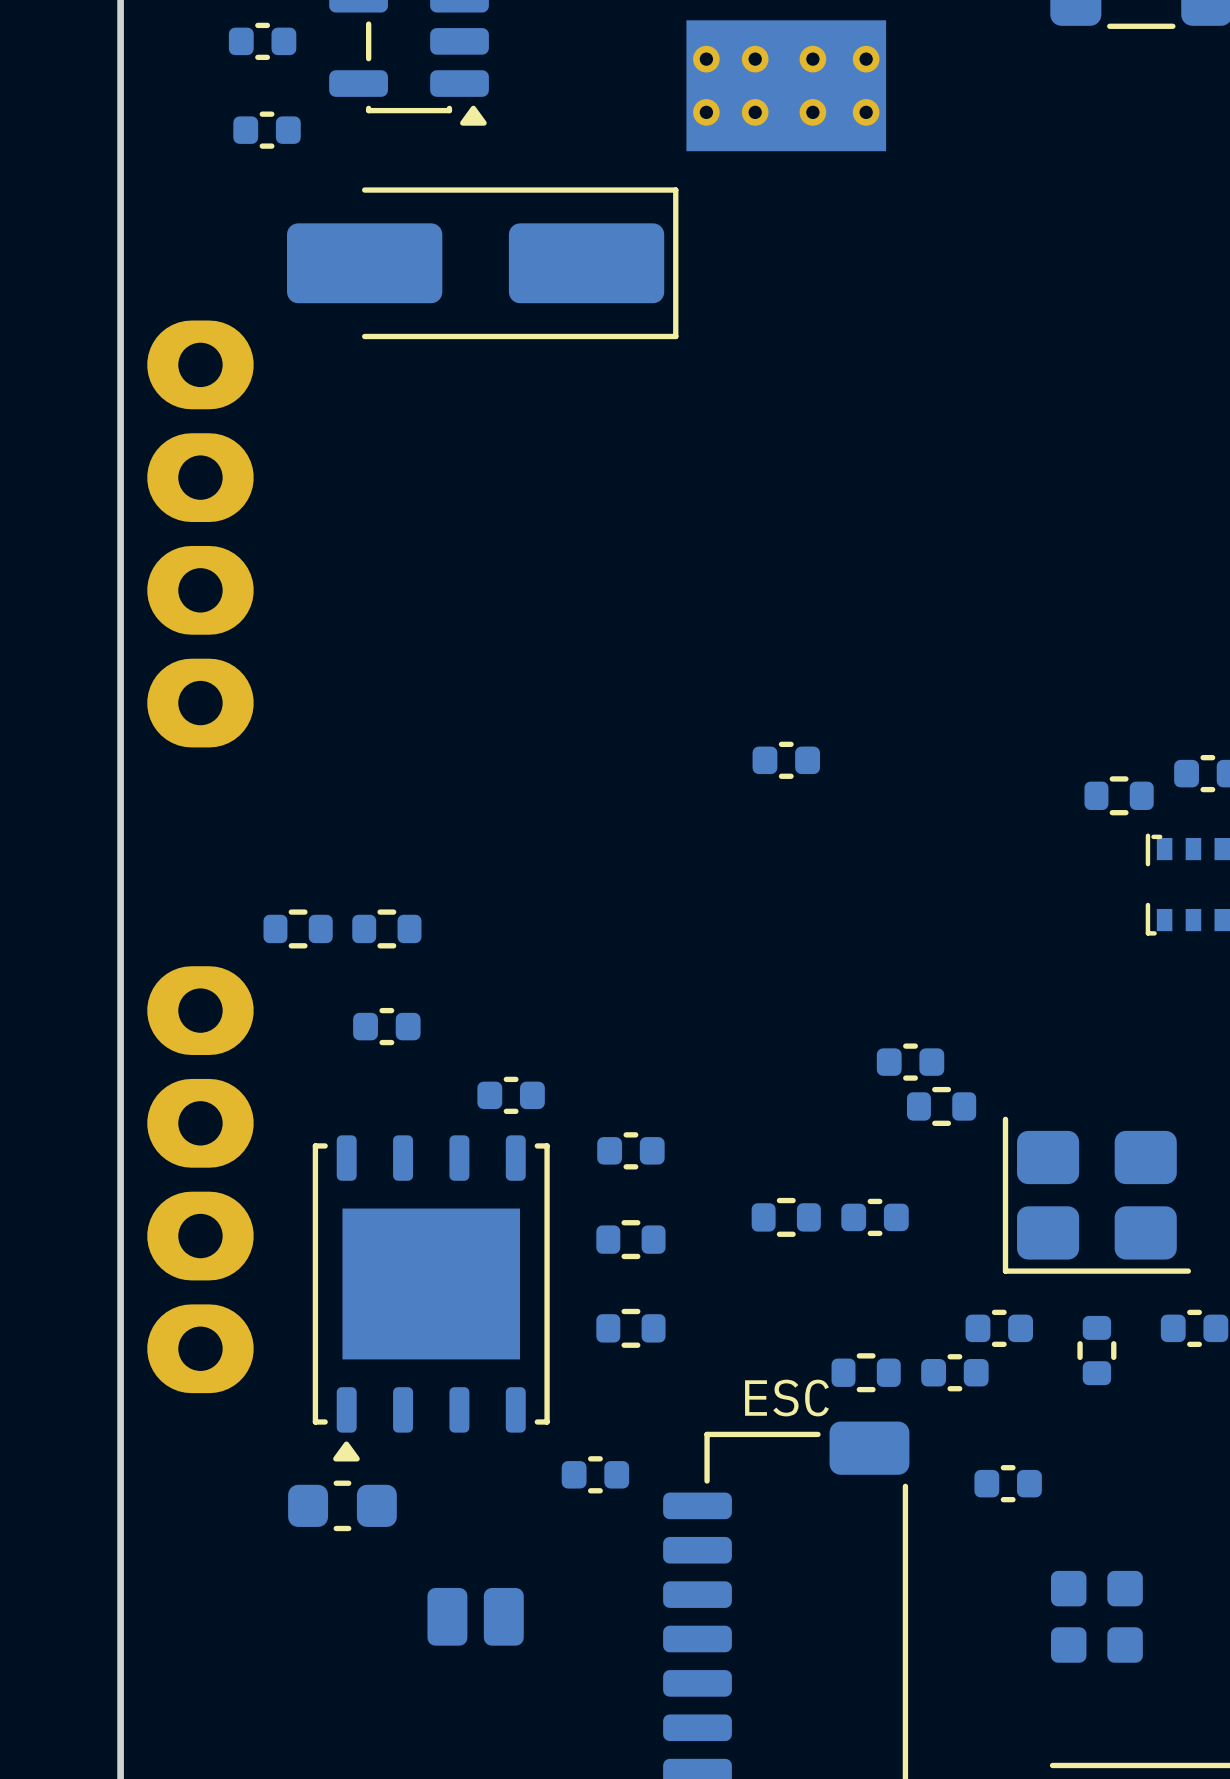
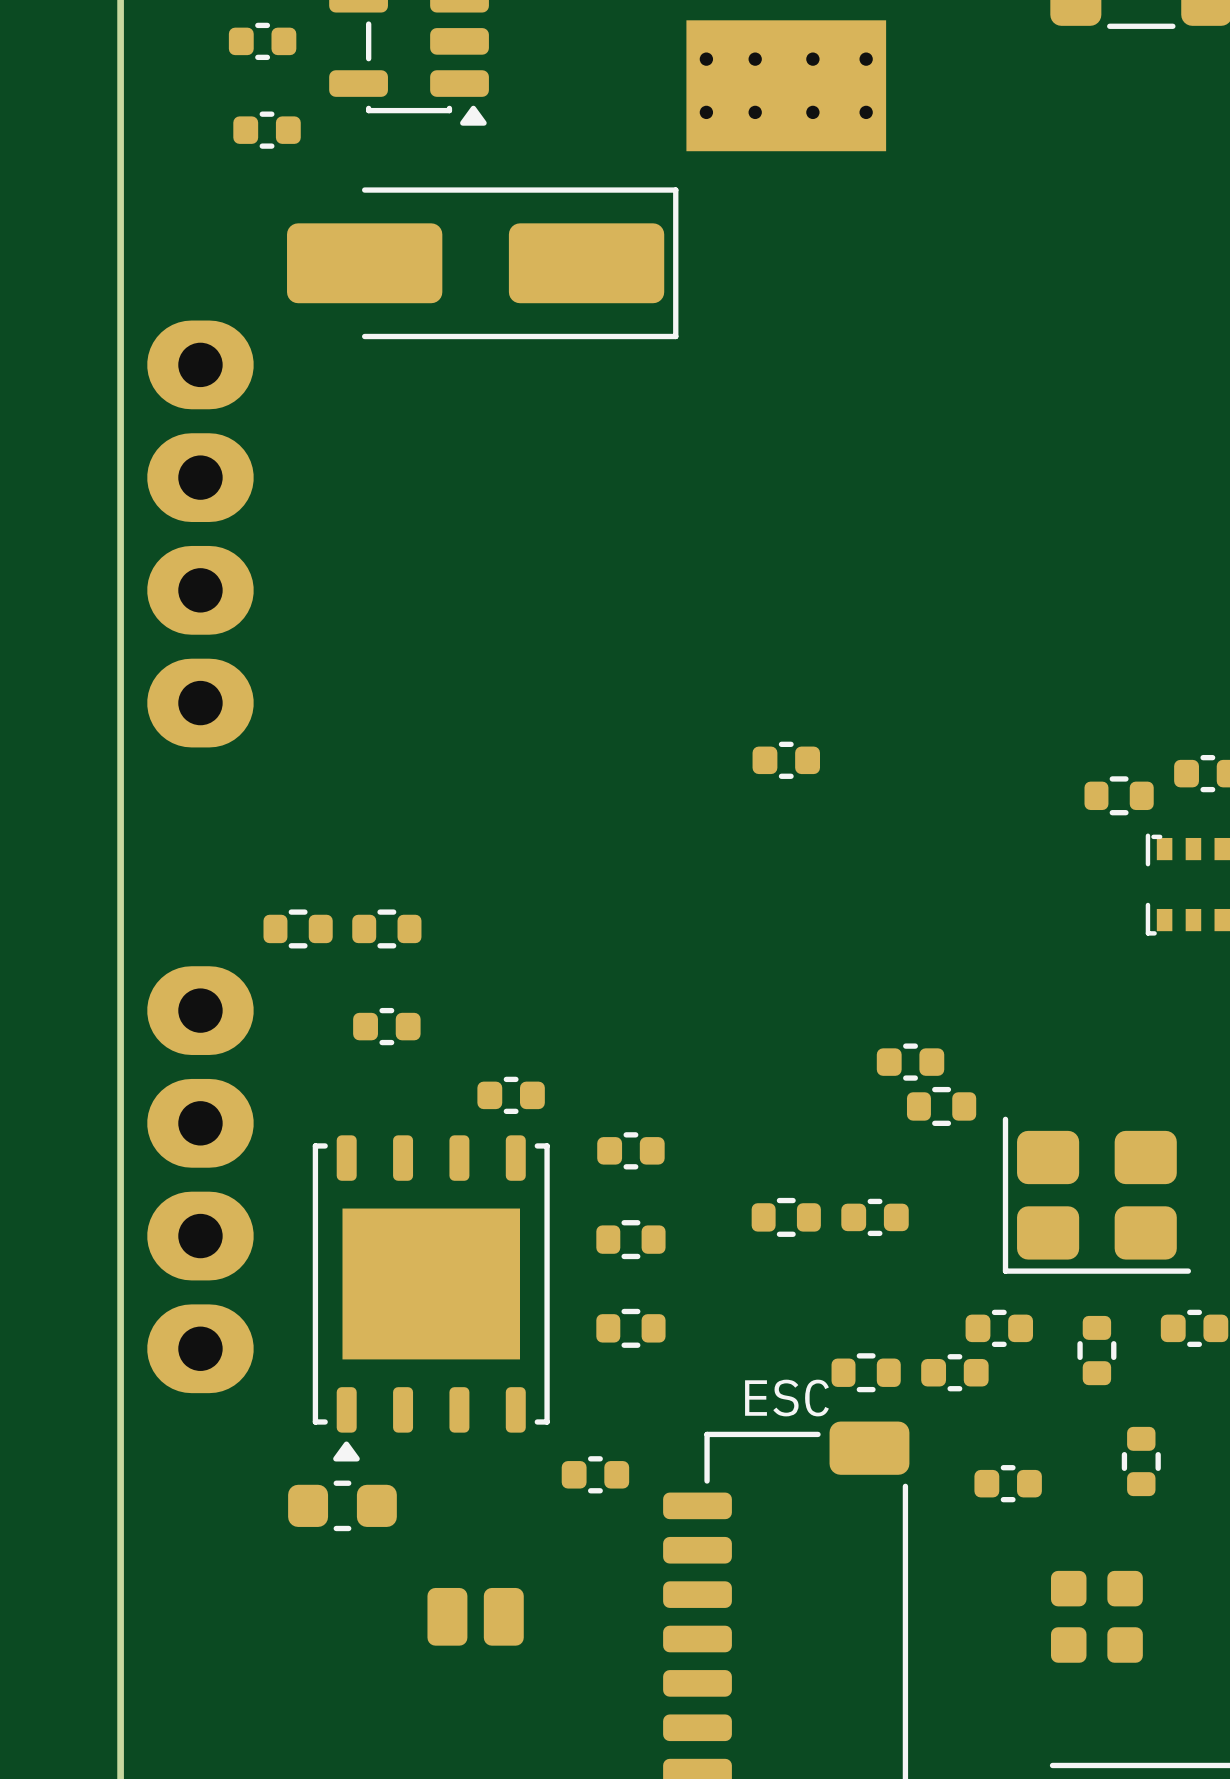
part: none -> (1141, 1461)

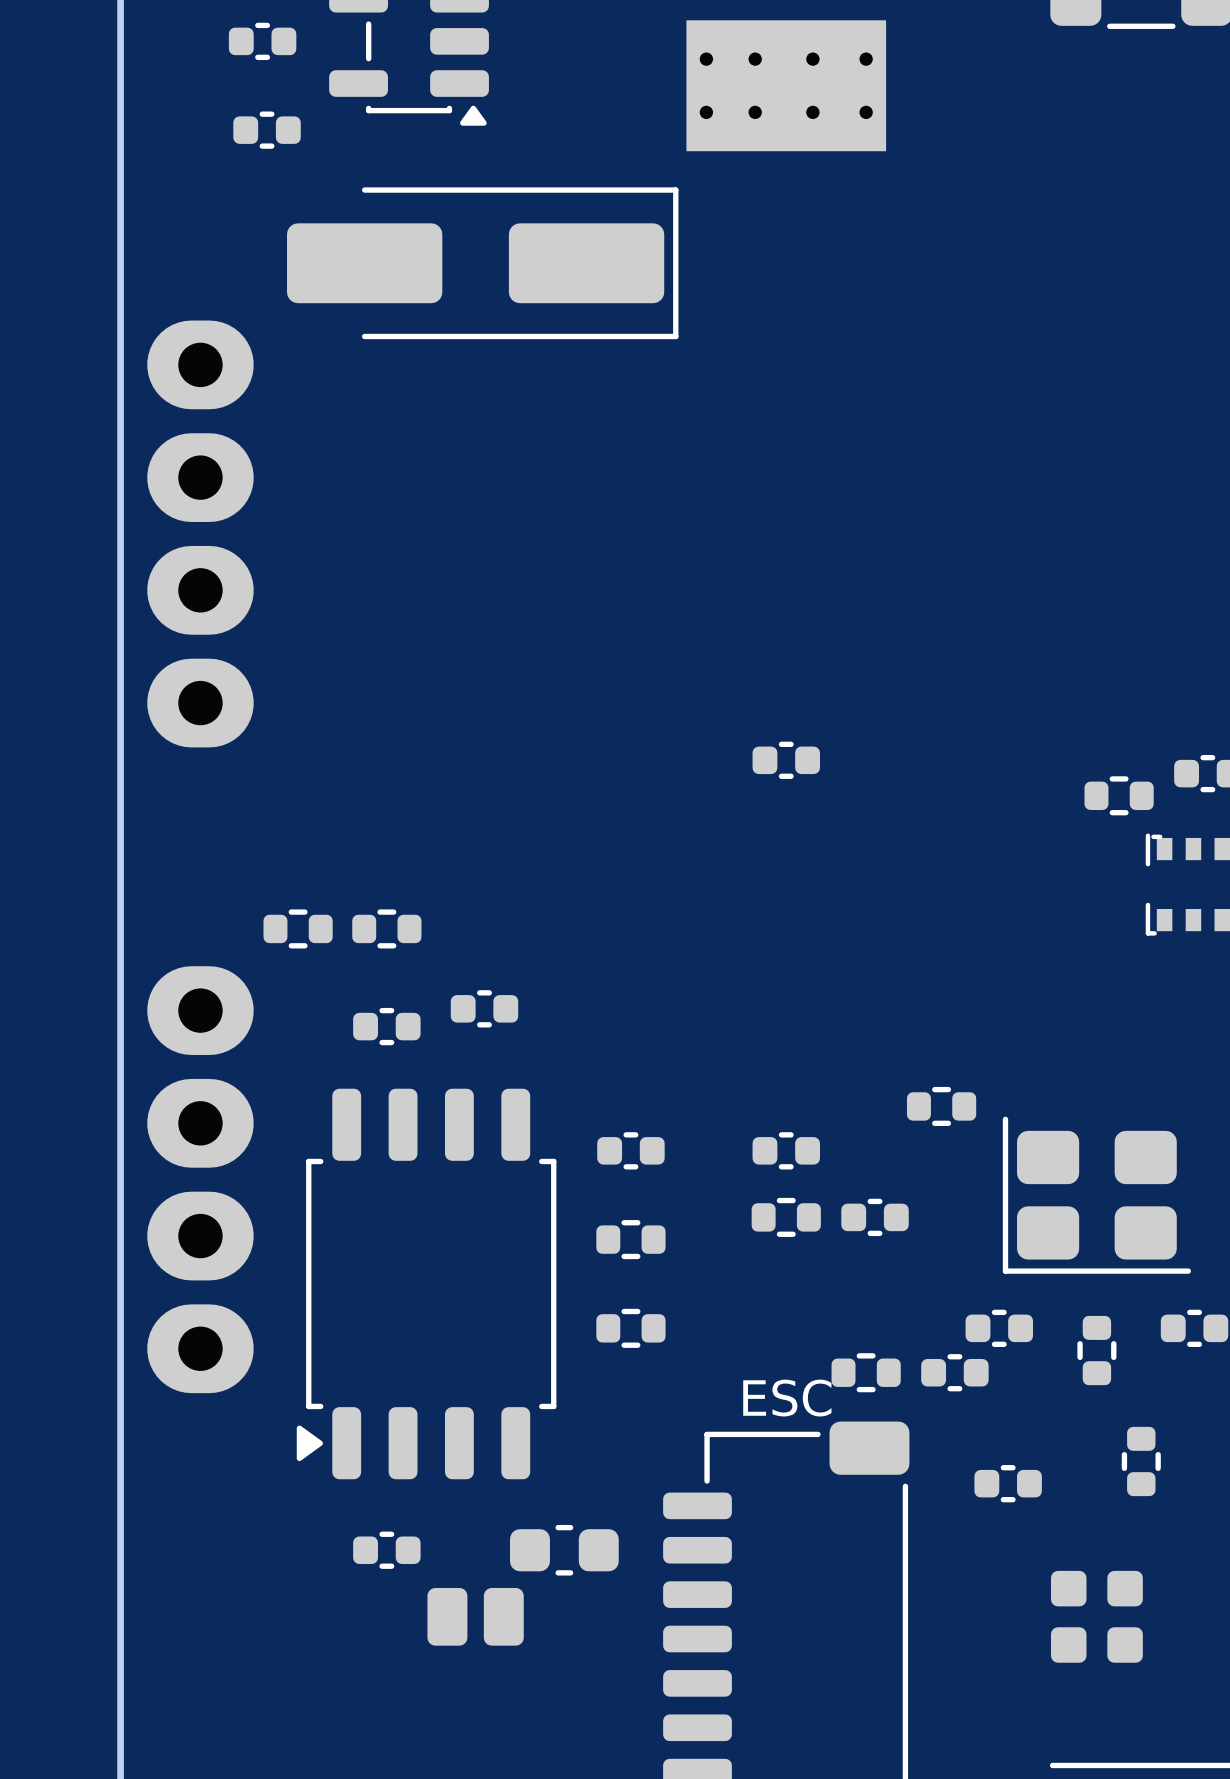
part: (910, 1062) -> none
part position: (511, 1095) -> (484, 1008)
part footprint: [312, 1135, 550, 1462] -> [296, 1088, 557, 1480]
part: none -> (786, 1150)
part: (595, 1474) -> none
part position: (342, 1505) -> (564, 1550)
part: none -> (386, 1550)

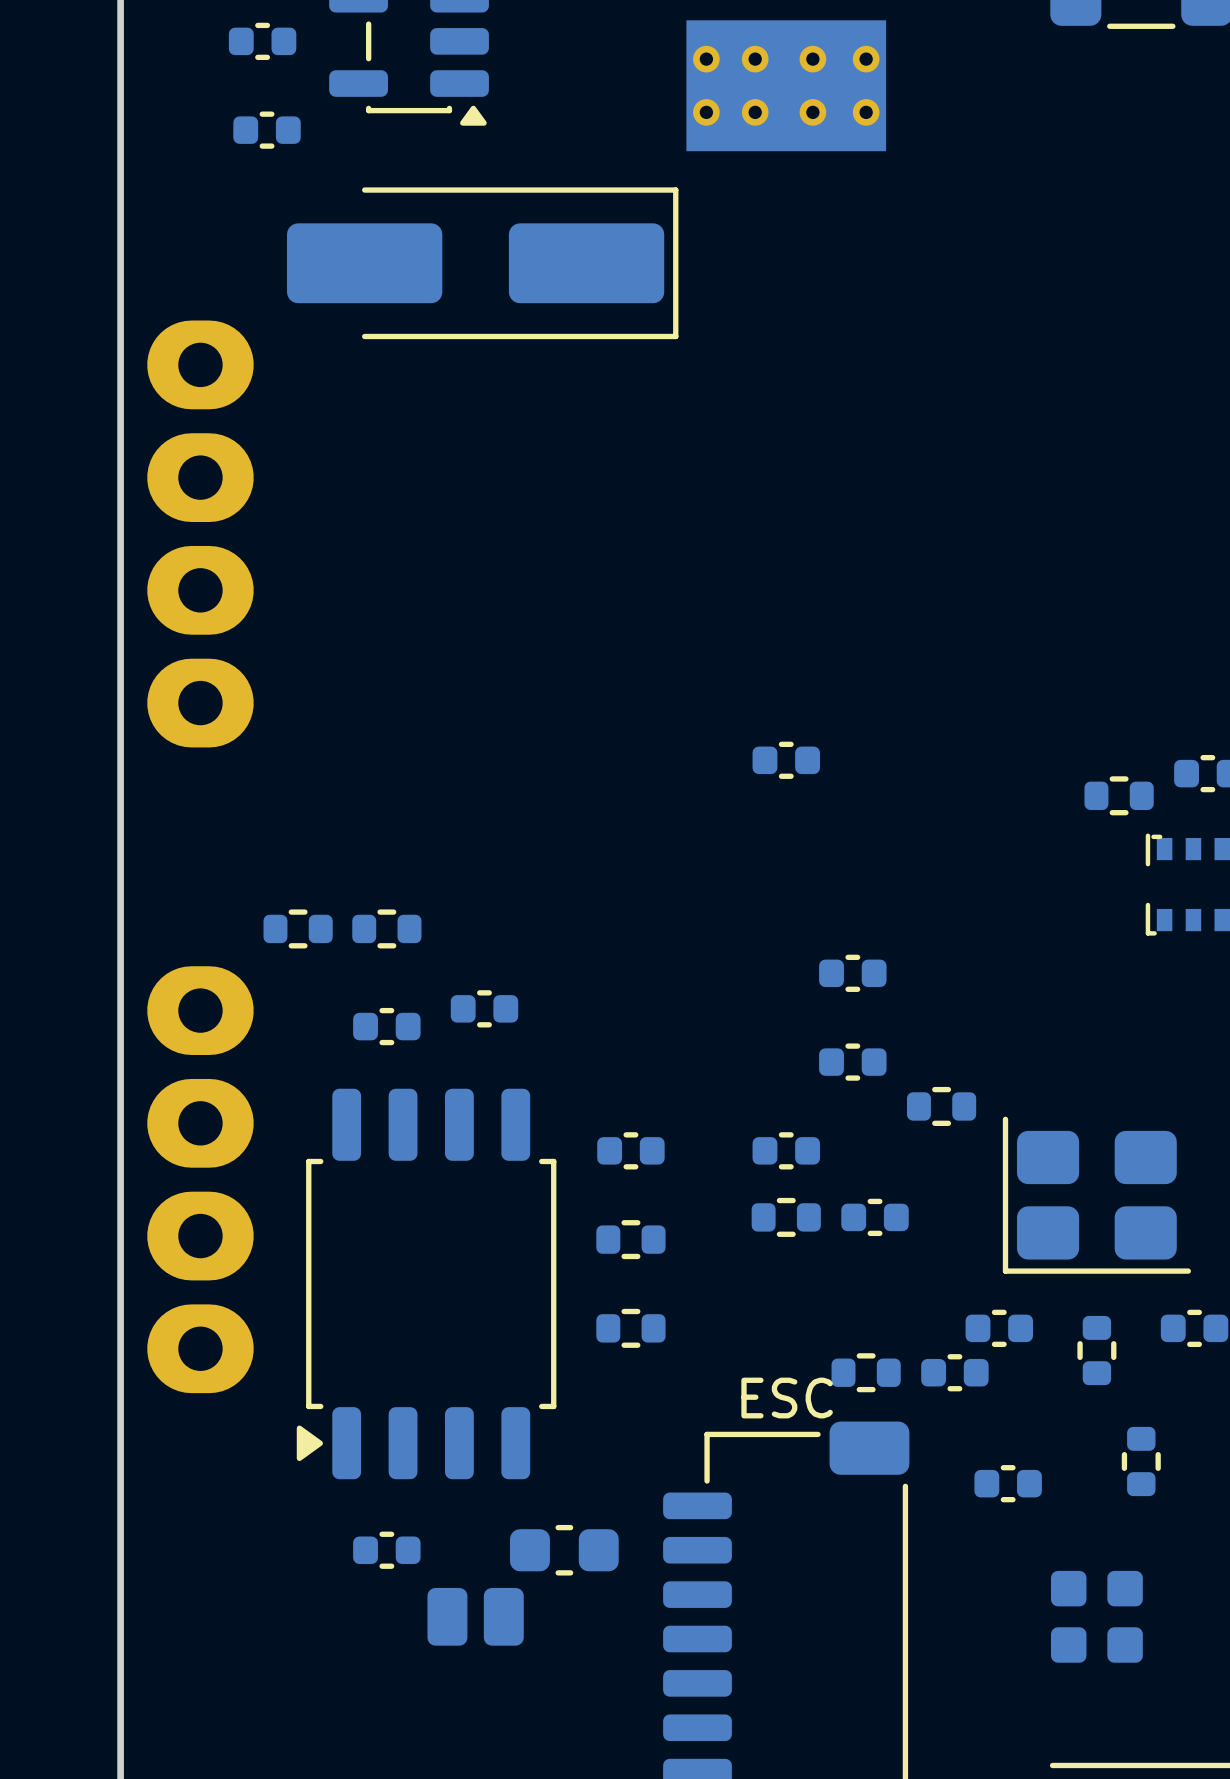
part: none -> (852, 973)
part: none -> (852, 1062)

